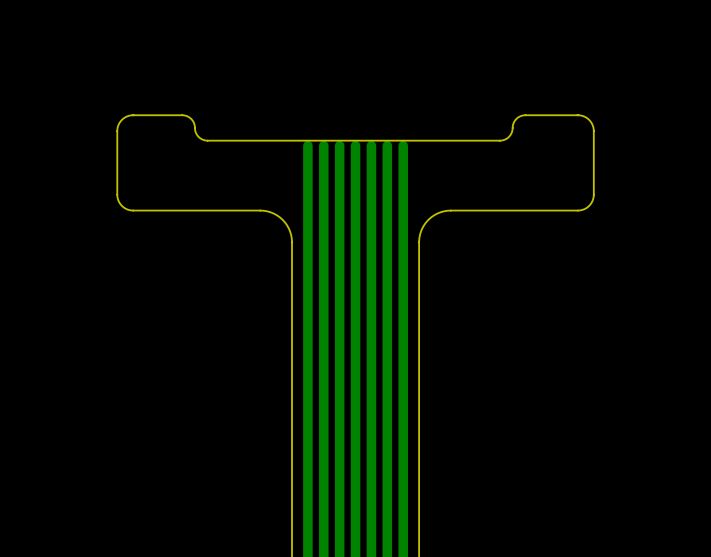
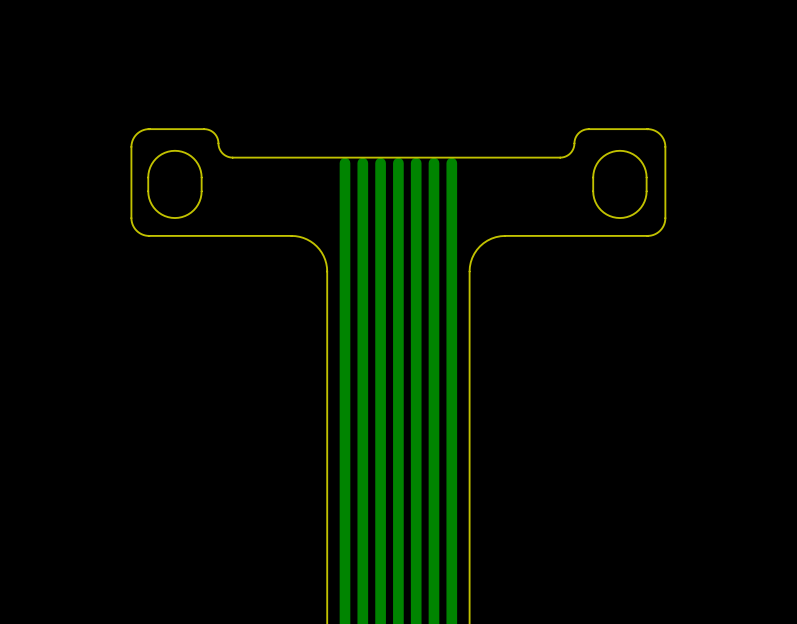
board edge: none -> (148, 177) (148, 191) (148, 194) (150, 201) (161, 214) (171, 217) (181, 217) (191, 212) (198, 204) (201, 194) (201, 174) (198, 164) (188, 154) (174, 150) (161, 154) (151, 164) (149, 170) (148, 174) (148, 177)
board edge: none -> (593, 177) (595, 201) (606, 214) (616, 217) (626, 217) (636, 212) (643, 204) (646, 194) (646, 174) (643, 164) (633, 154) (619, 150) (606, 154) (596, 164) (593, 177)

